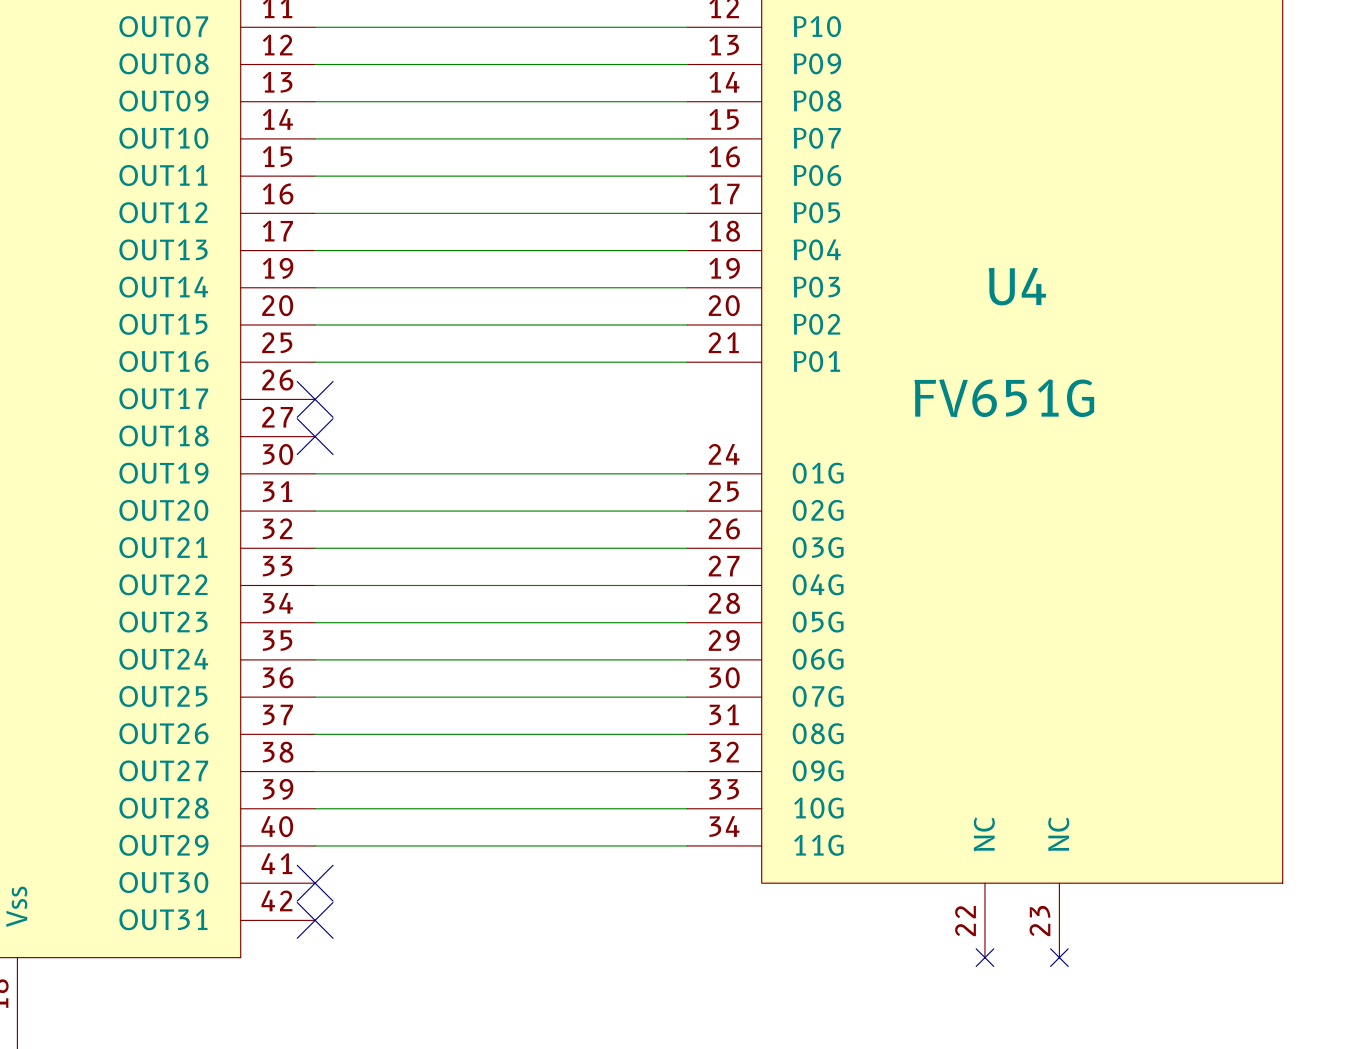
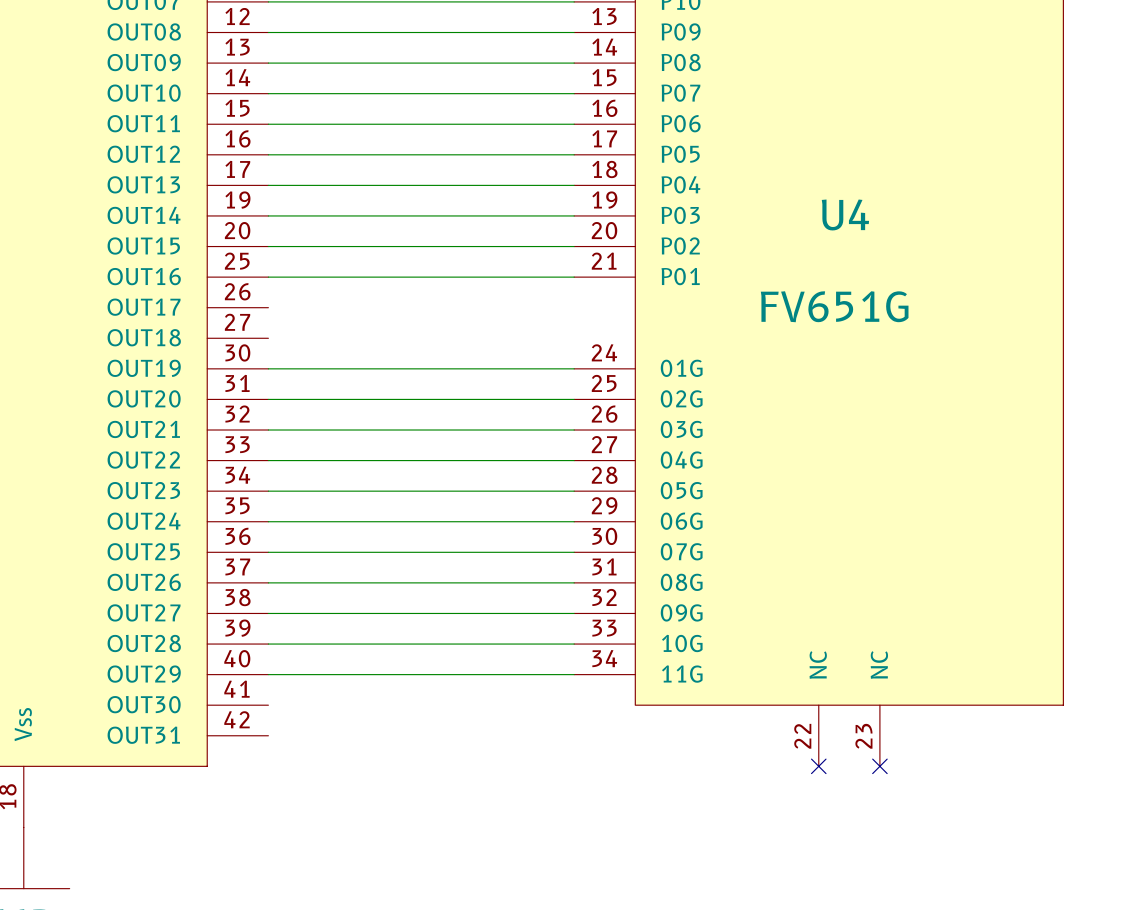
no-connect mark: (315, 399) -> none
no-connect mark: (315, 436) -> none
no-connect mark: (315, 883) -> none
no-connect mark: (315, 920) -> none

